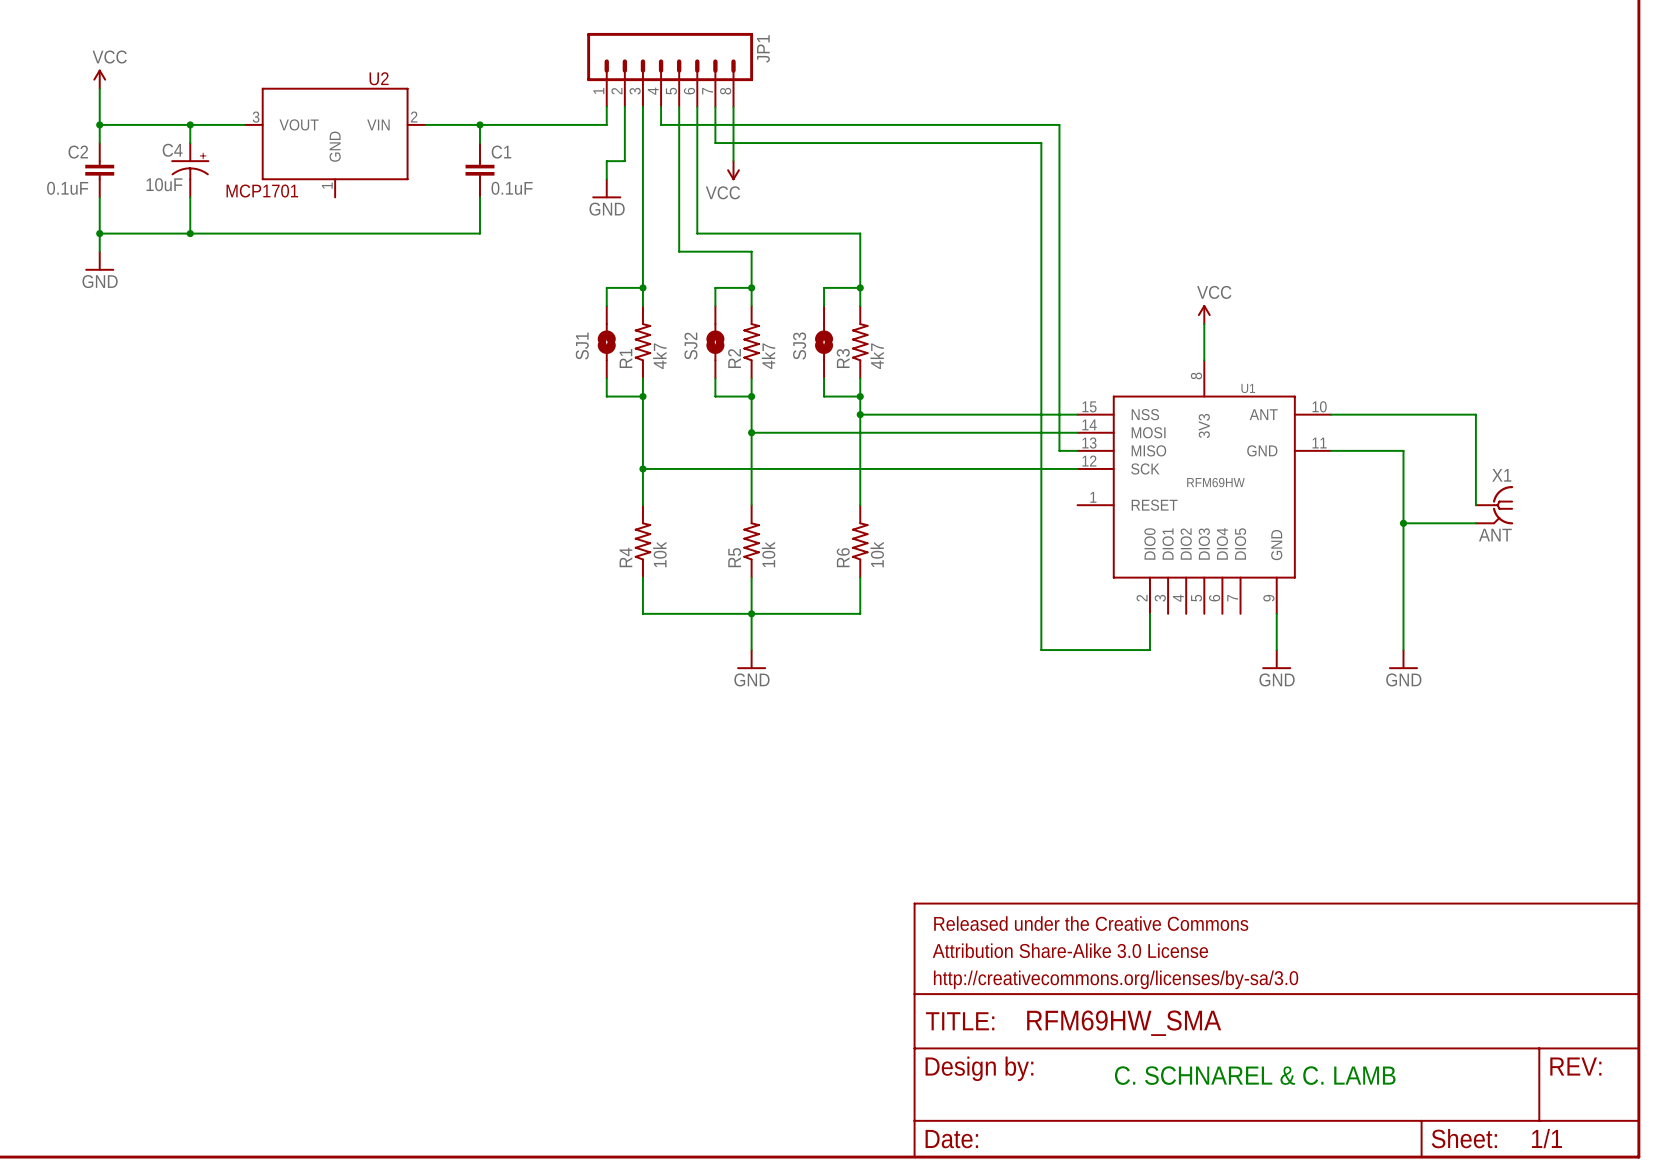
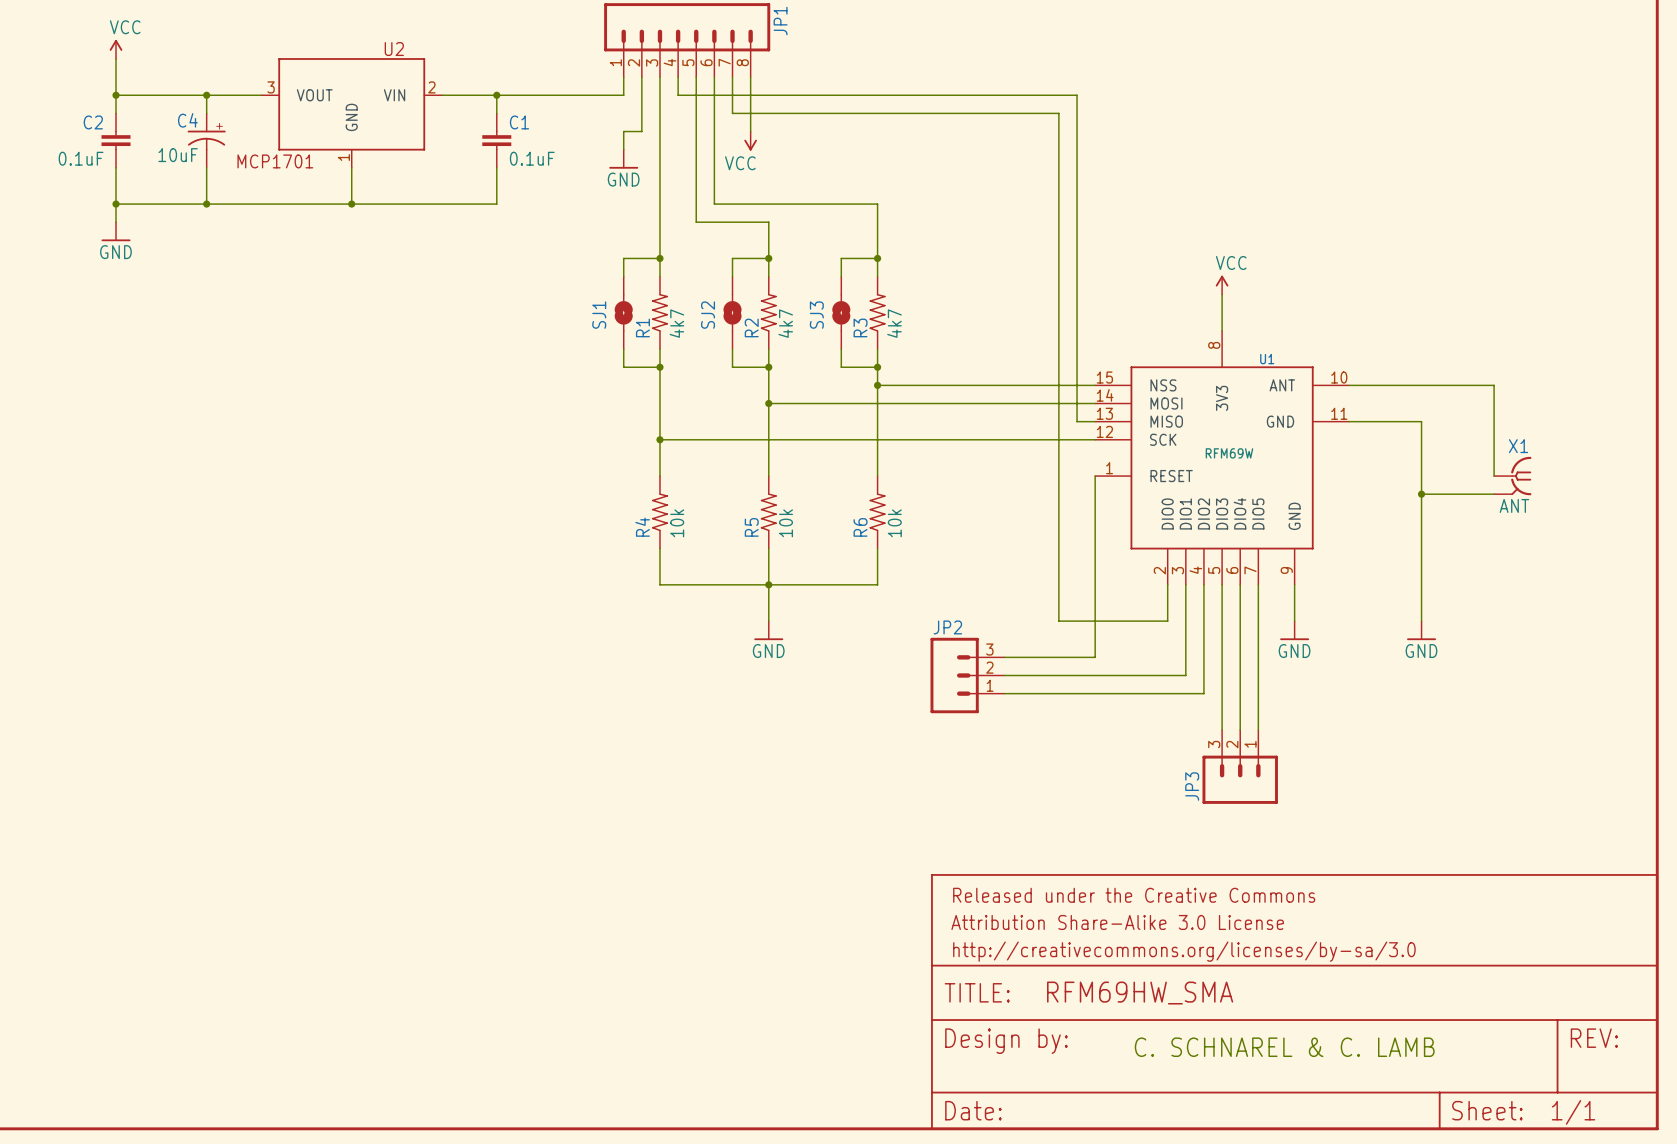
wire: none -> (351, 167) (351, 204)
junction: none -> (351, 204)
U1 value: RFM69HW (1215, 482) -> RFM69W (1229, 453)
wire: none -> (1095, 476) (1095, 657) (1004, 657)
wire: none -> (1185, 584) (1185, 675) (1004, 675)
wire: none -> (1203, 584) (1203, 693) (1004, 693)
wire: none -> (1222, 584) (1222, 729)
wire: none -> (1240, 584) (1240, 729)
wire: none -> (1258, 584) (1258, 729)
JP2: none -> (967, 675)
JP3: none -> (1240, 766)

